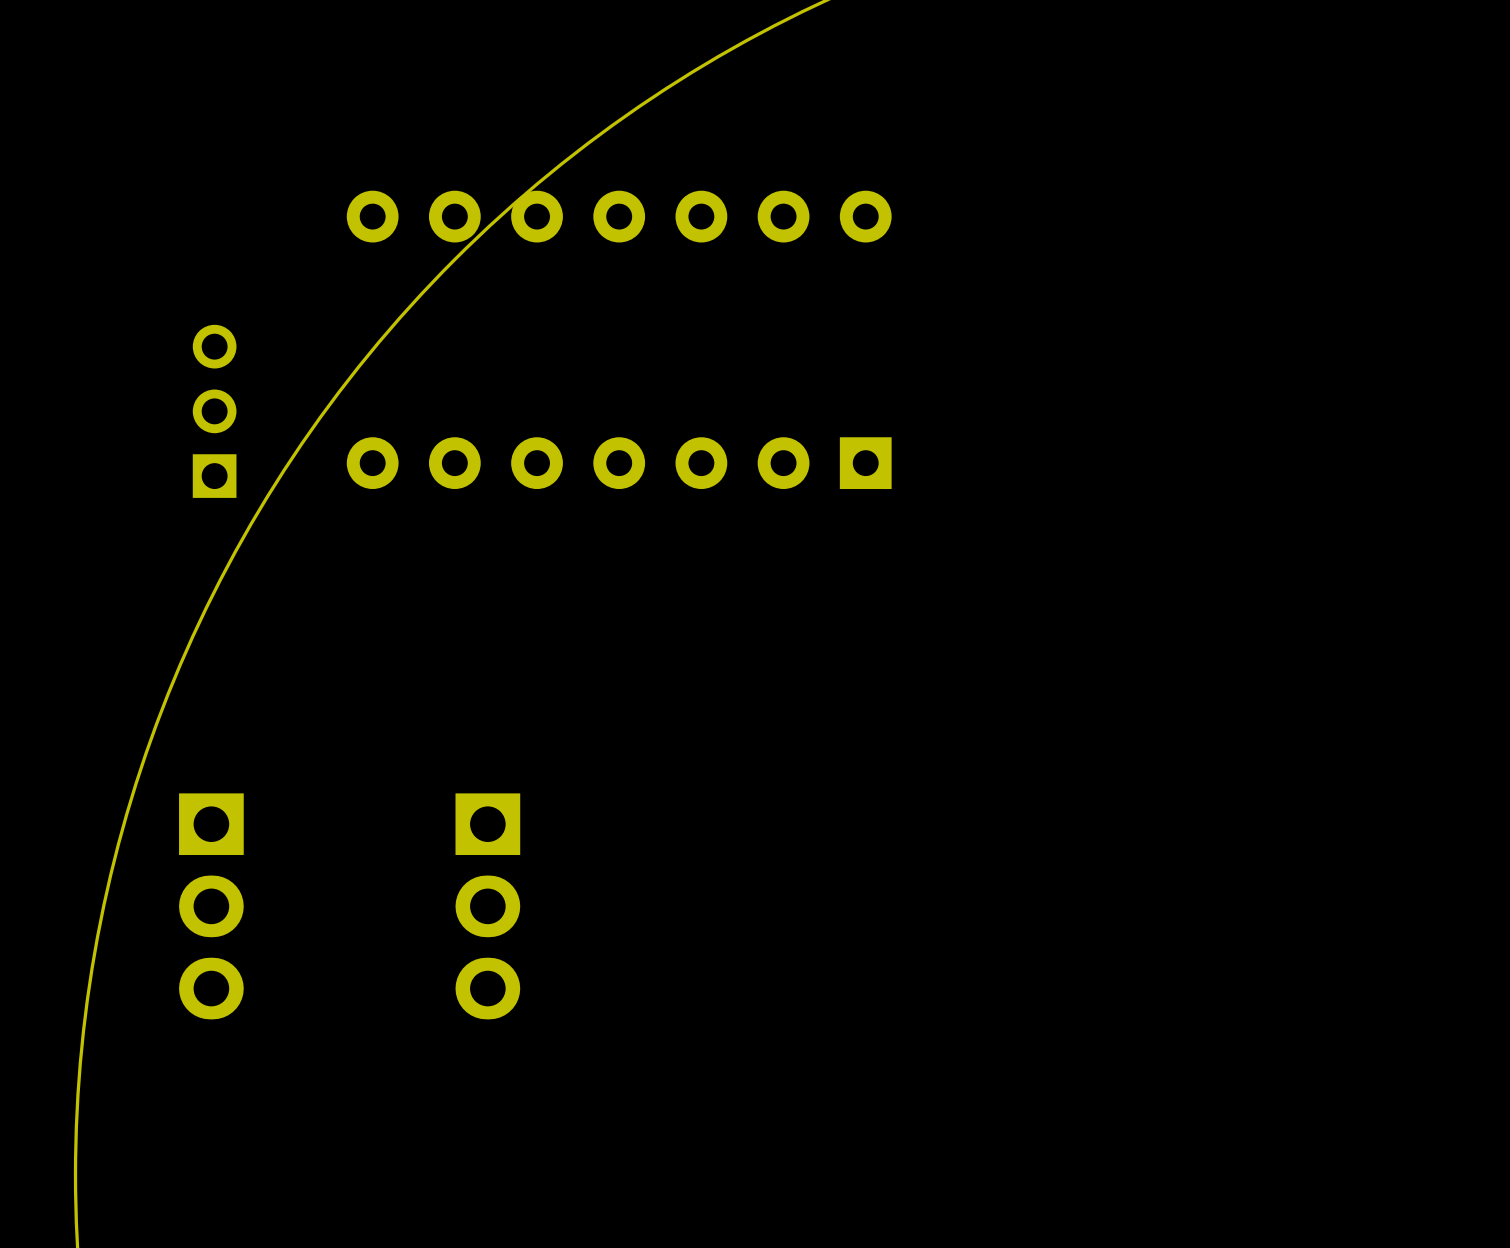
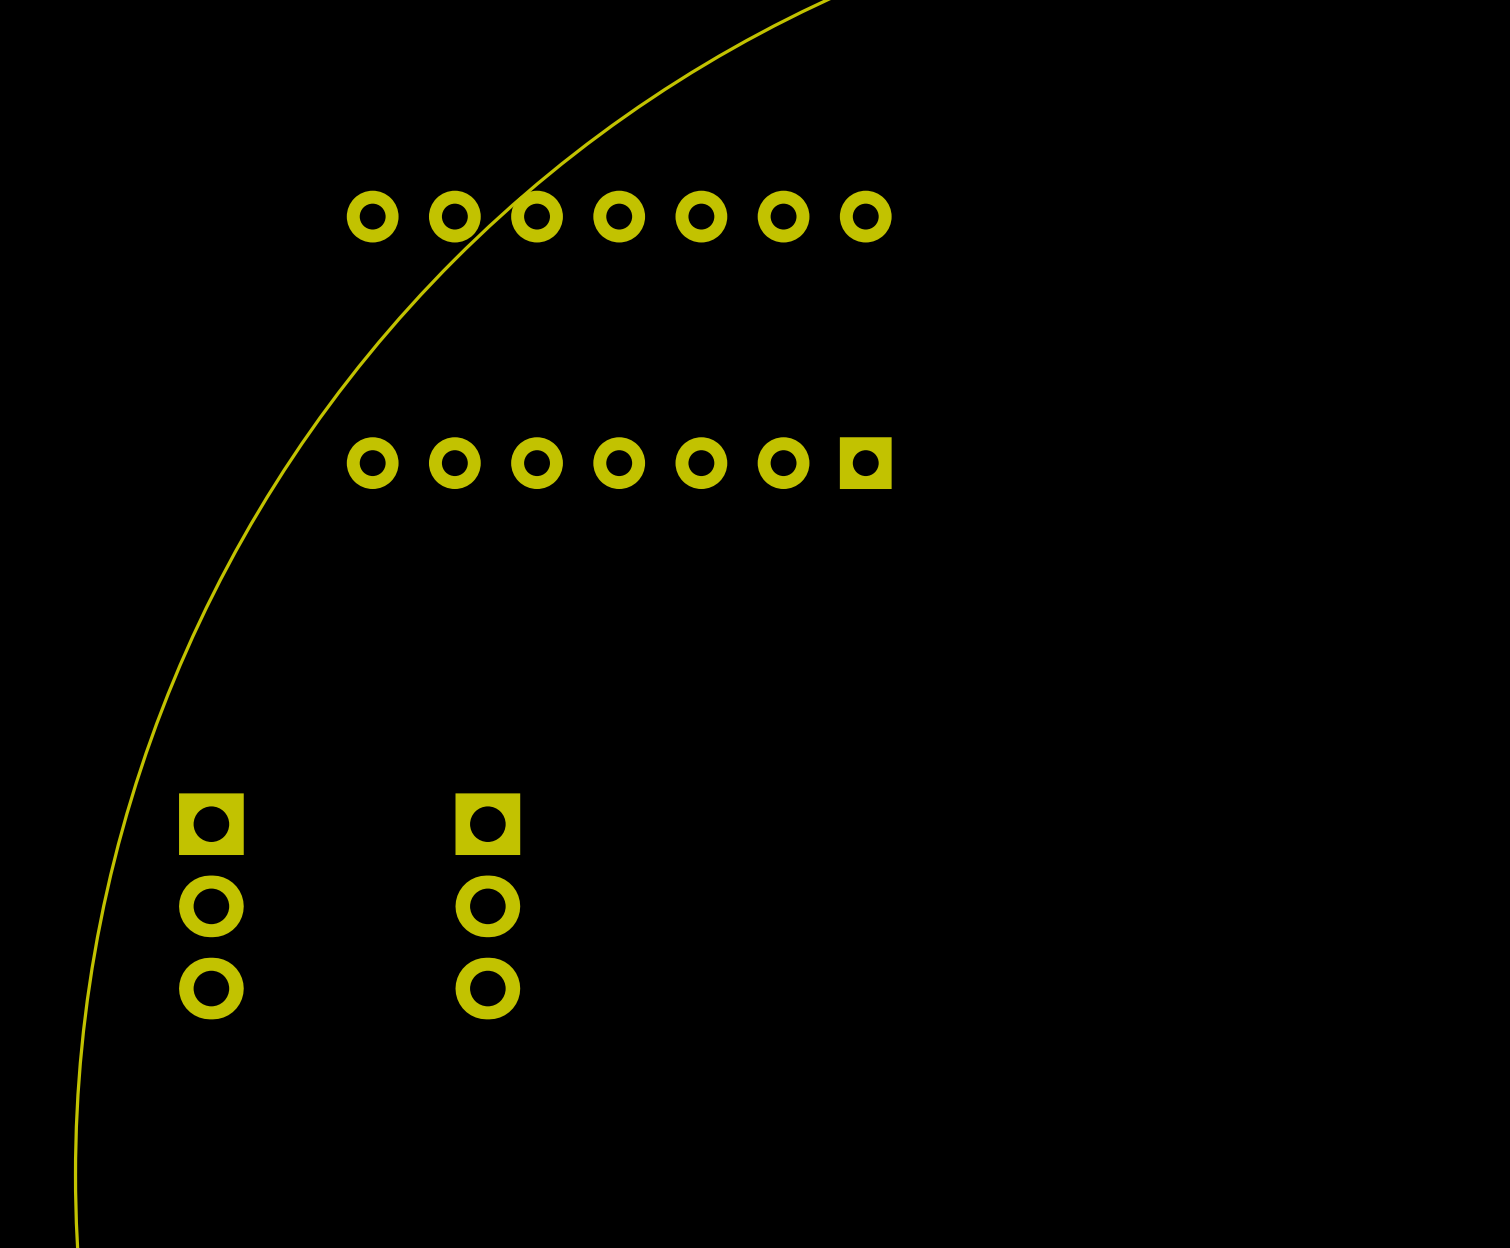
part: (214, 411) -> none

